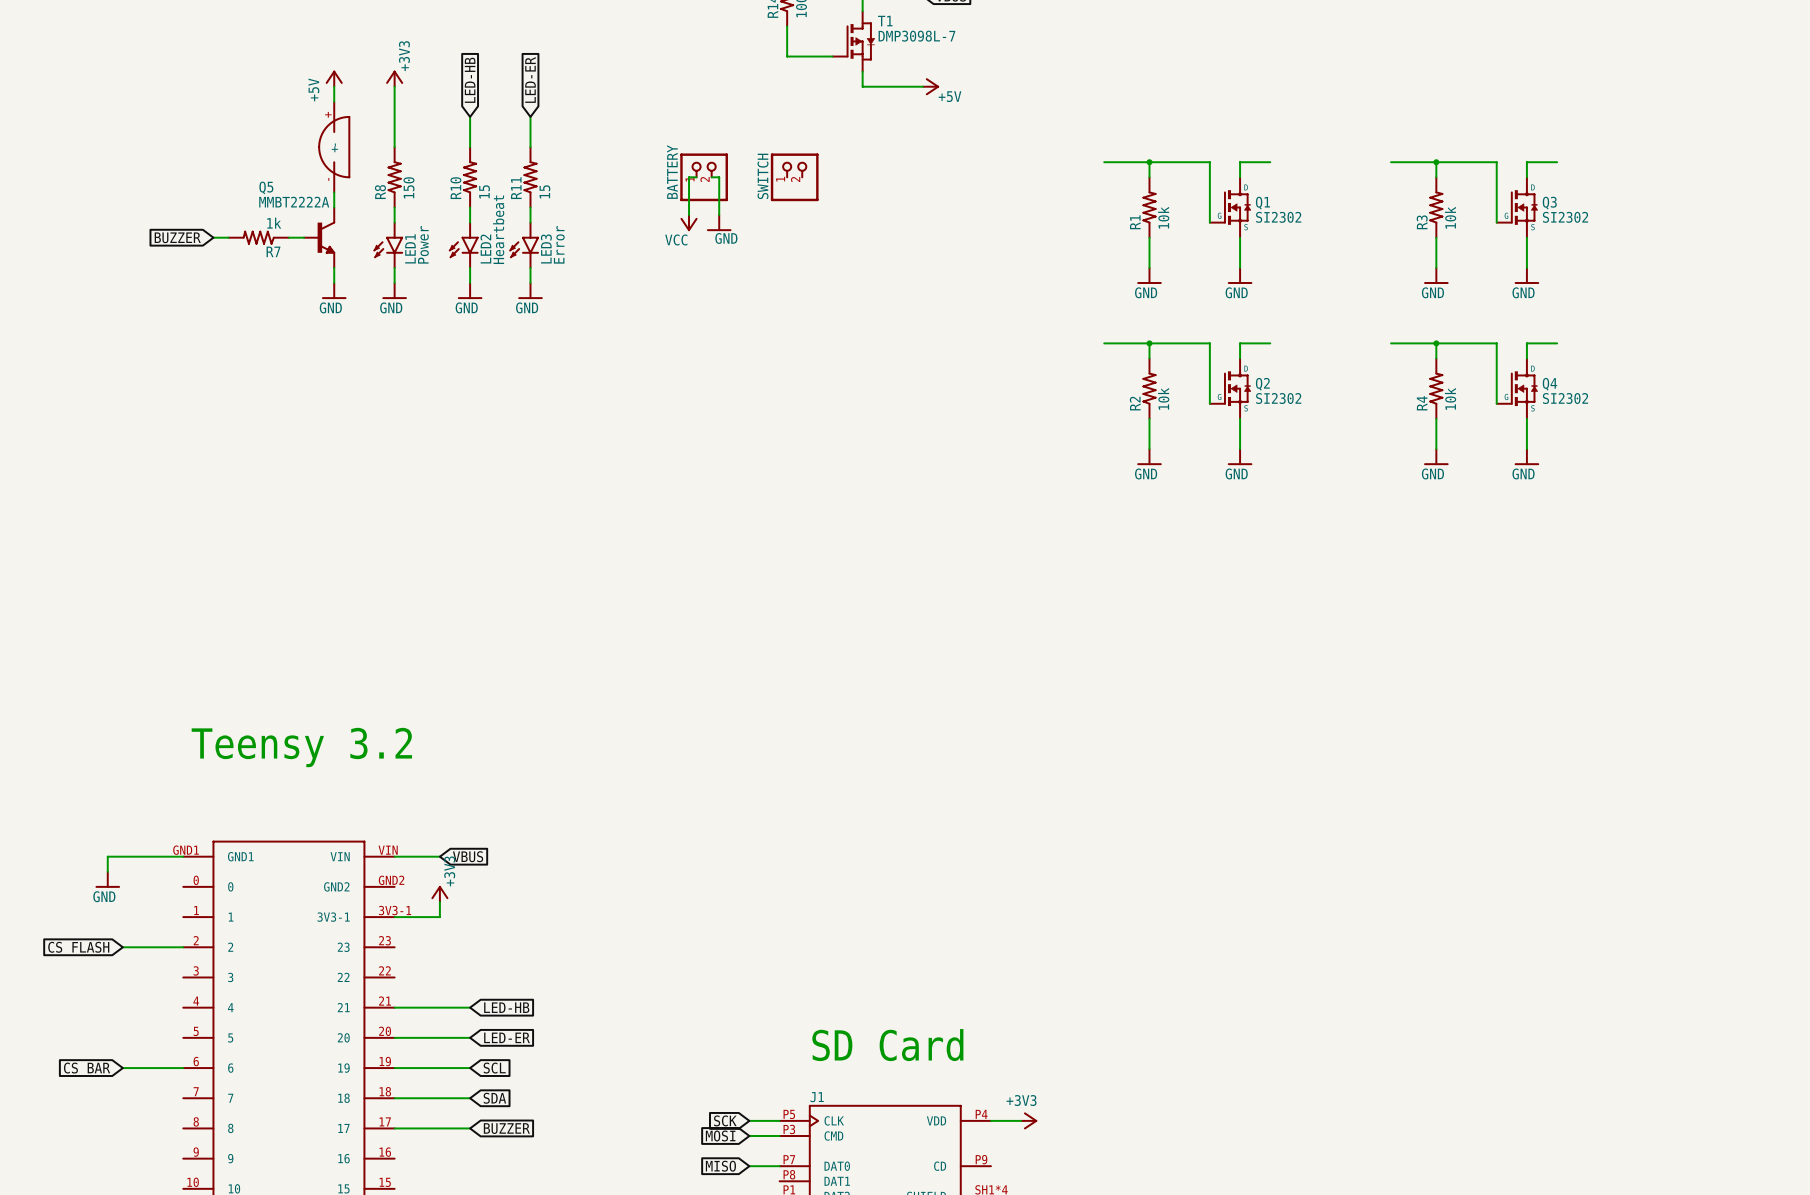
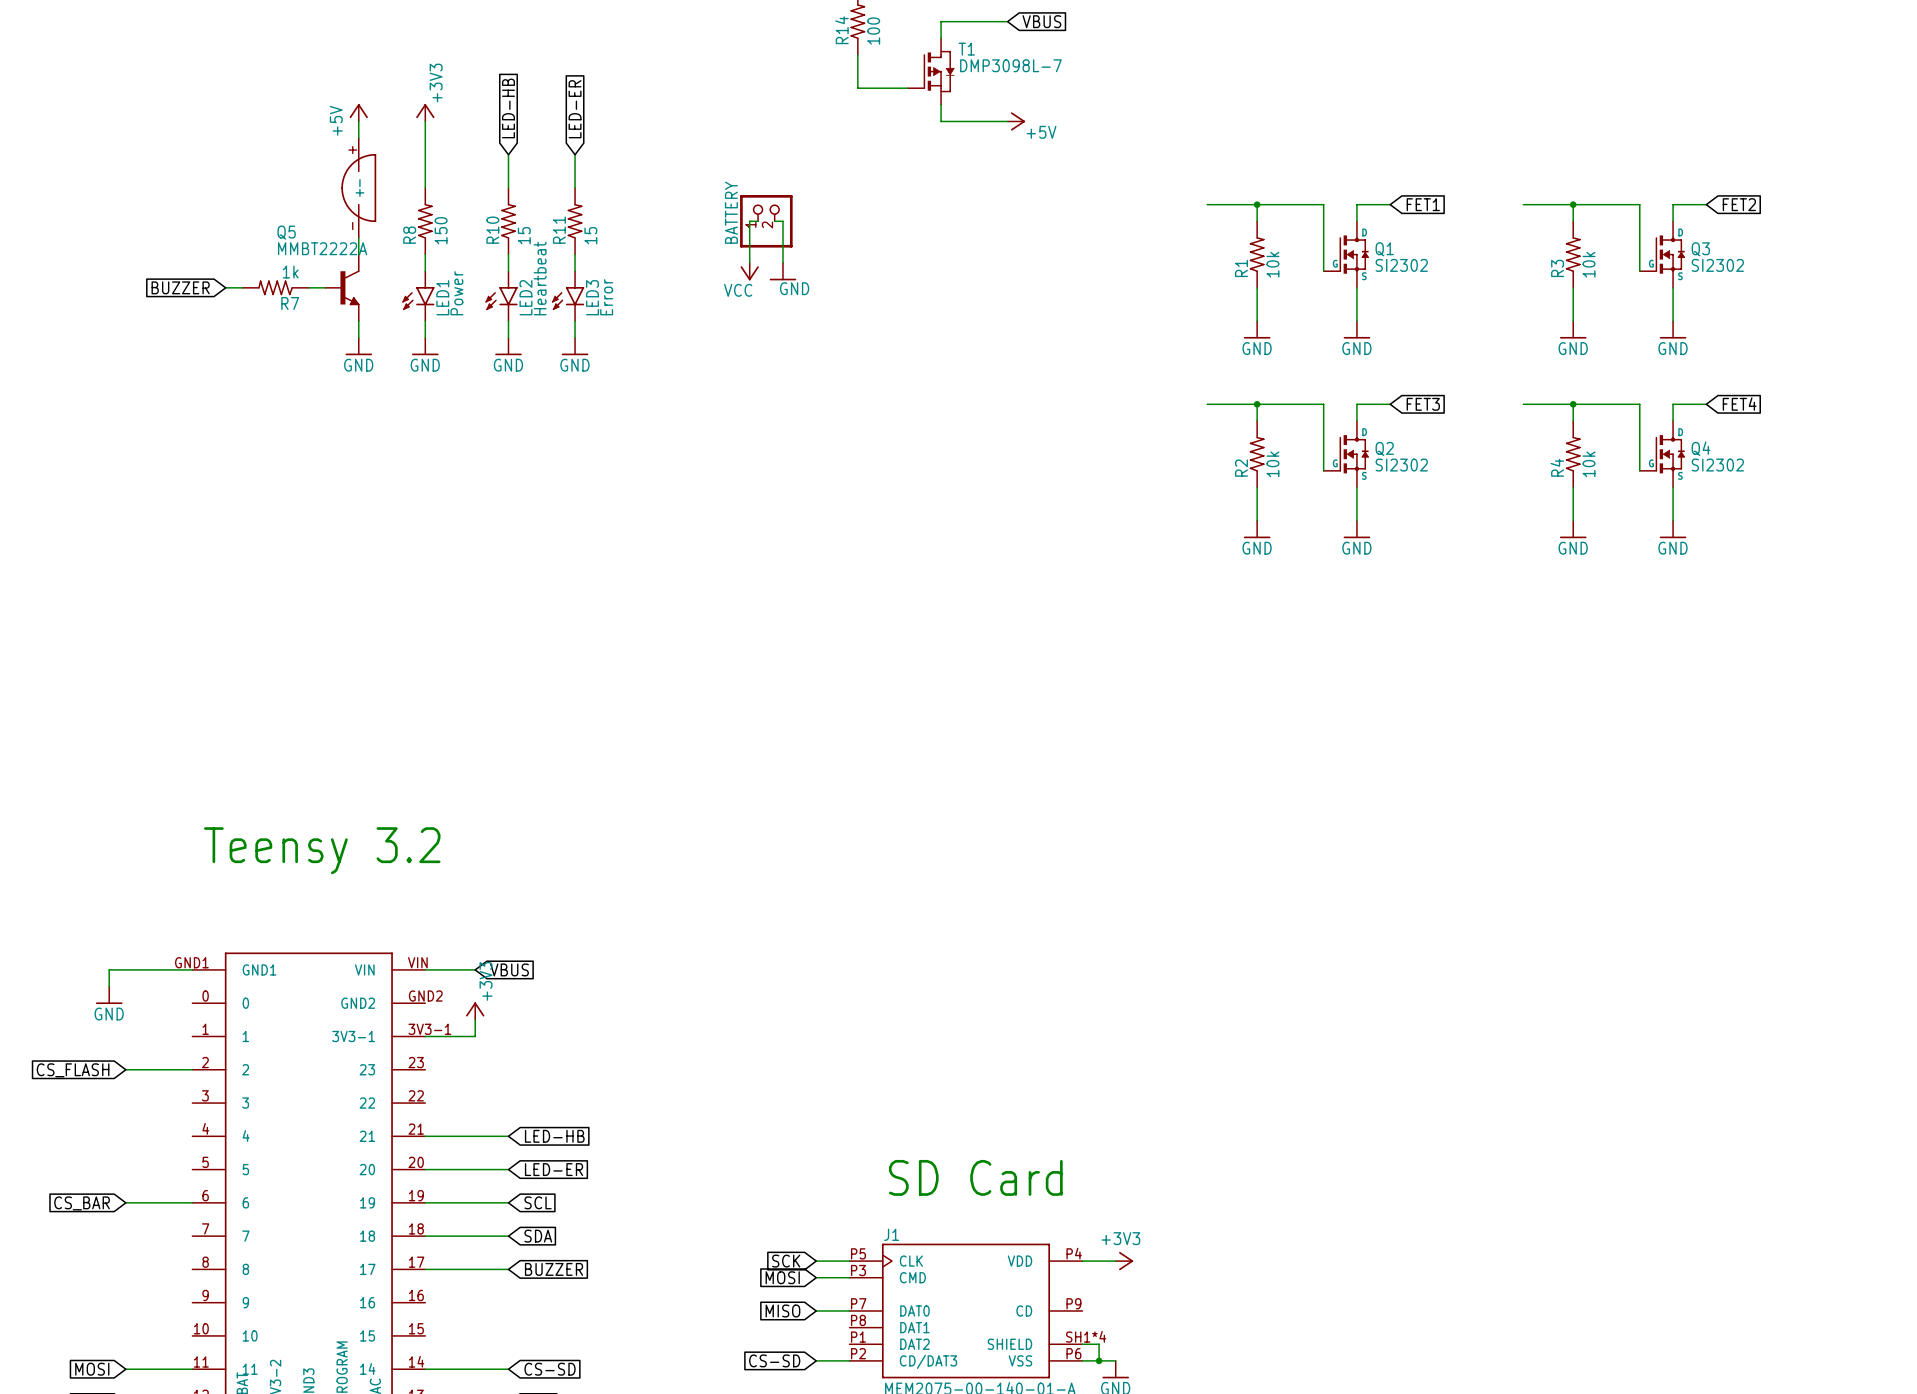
global label: none -> FET1 (1423, 204)
global label: none -> FET2 (1739, 204)
SWITCH: (794, 177) -> none
global label: none -> FET3 (1423, 404)
global label: none -> FET4 (1739, 404)

